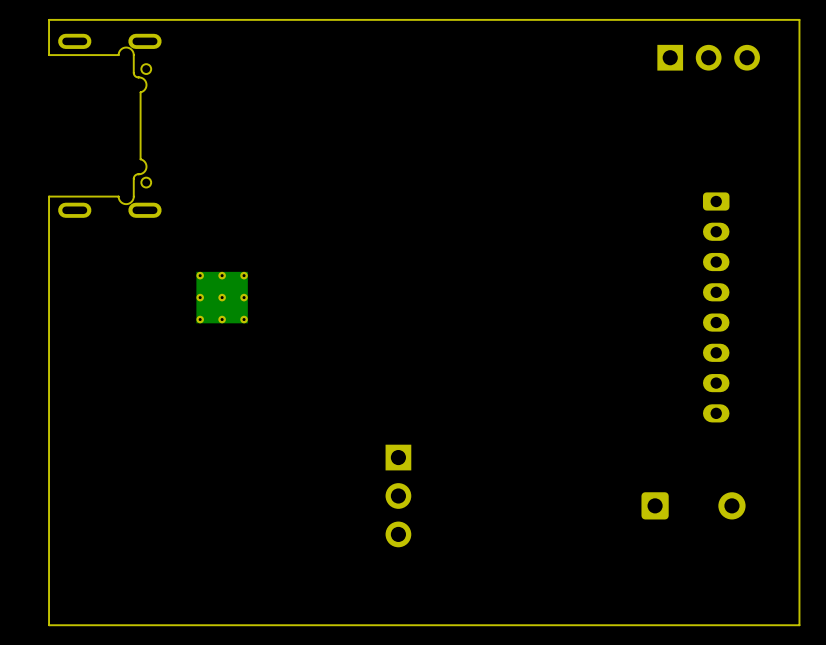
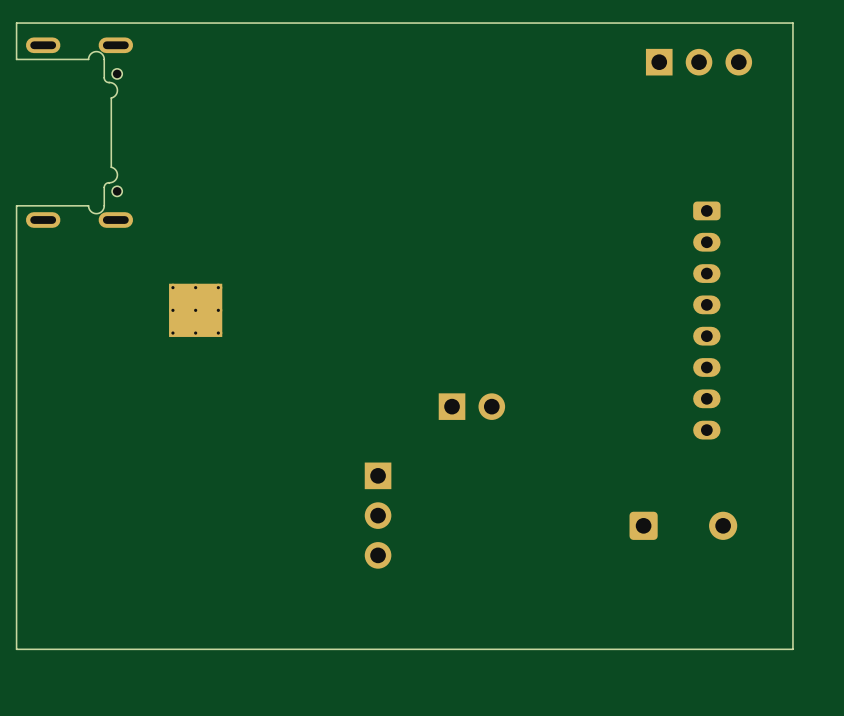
part: none -> (471, 406)

